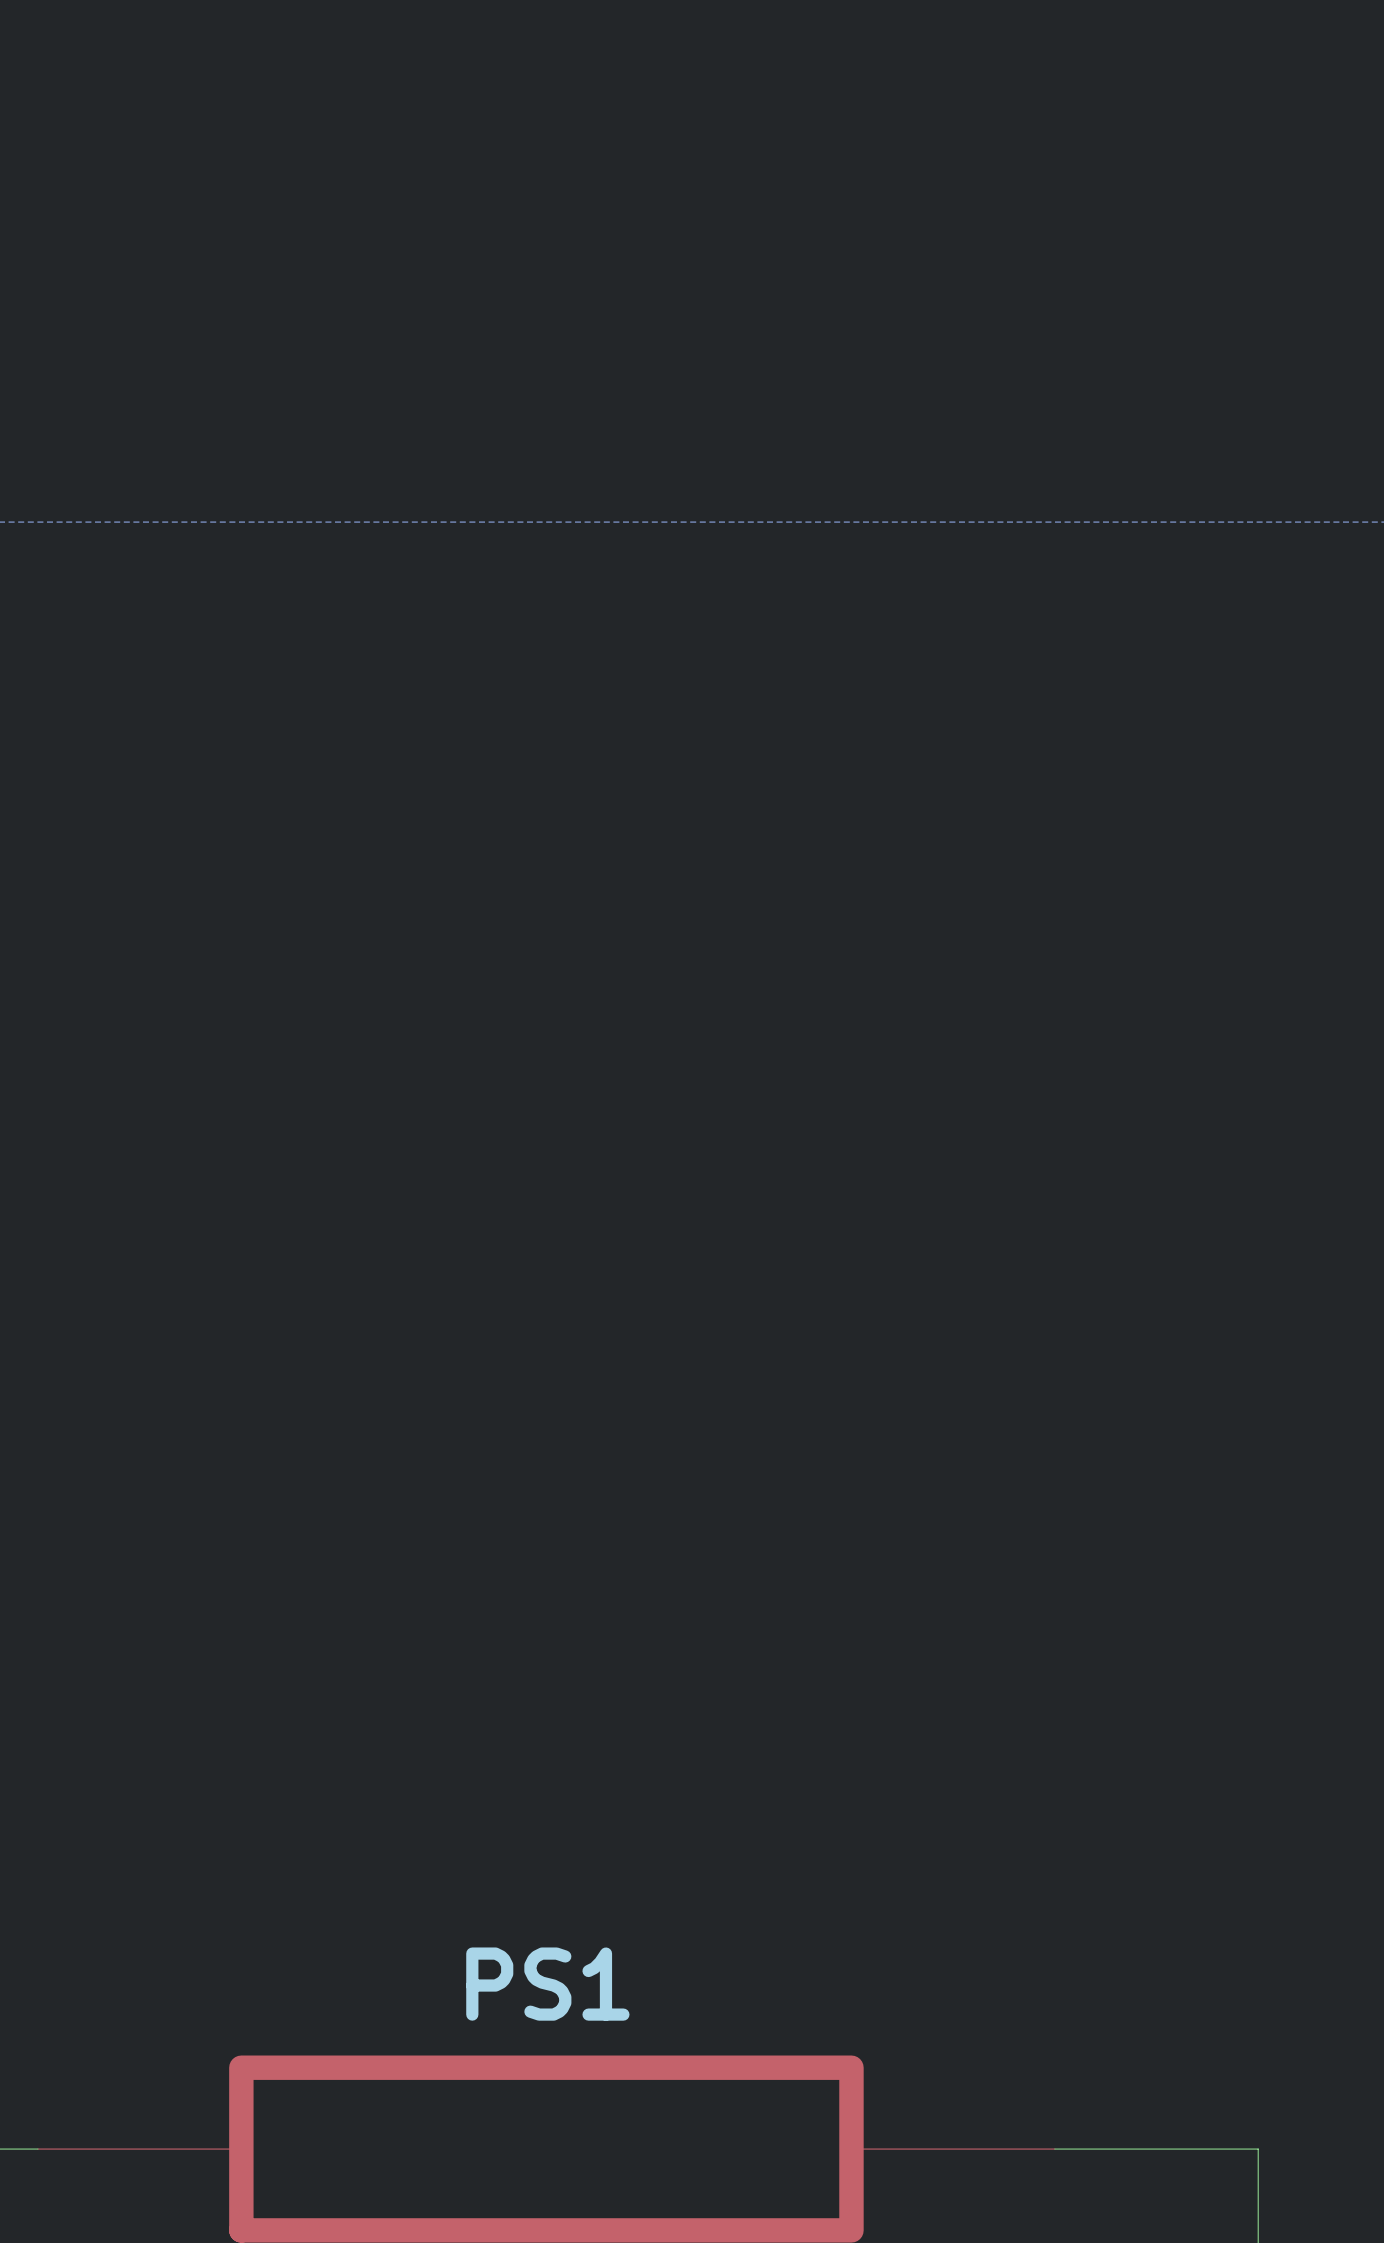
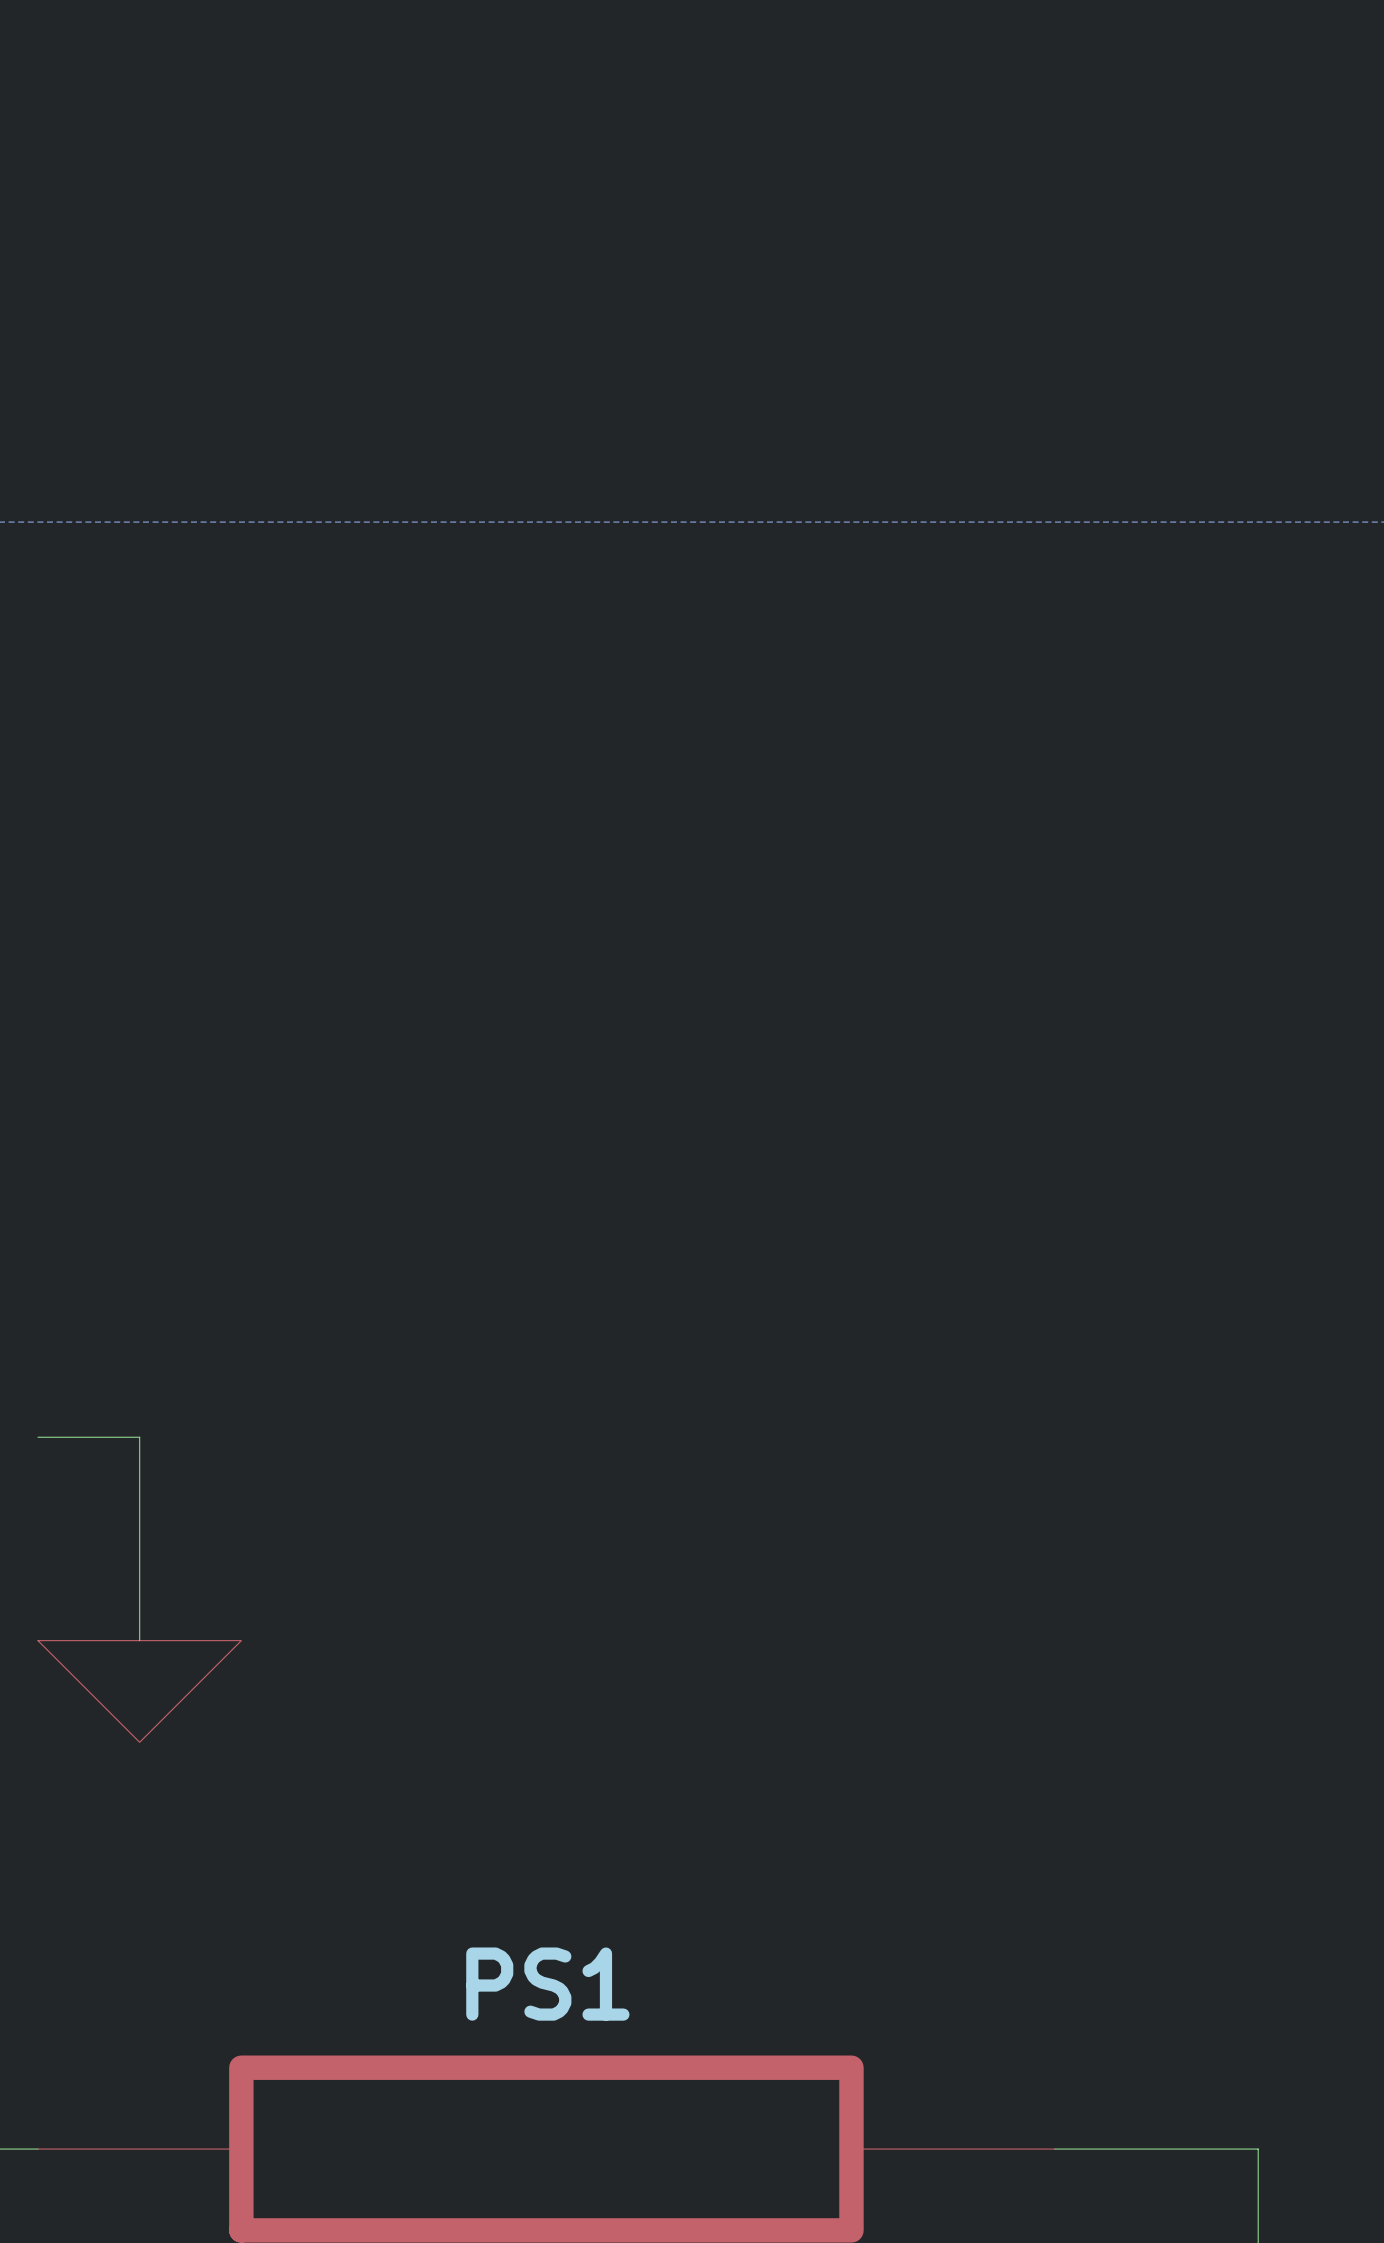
wire: none -> (37, 1437) (139, 1437) (139, 1640)
power symbol: none -> (139, 1691)

